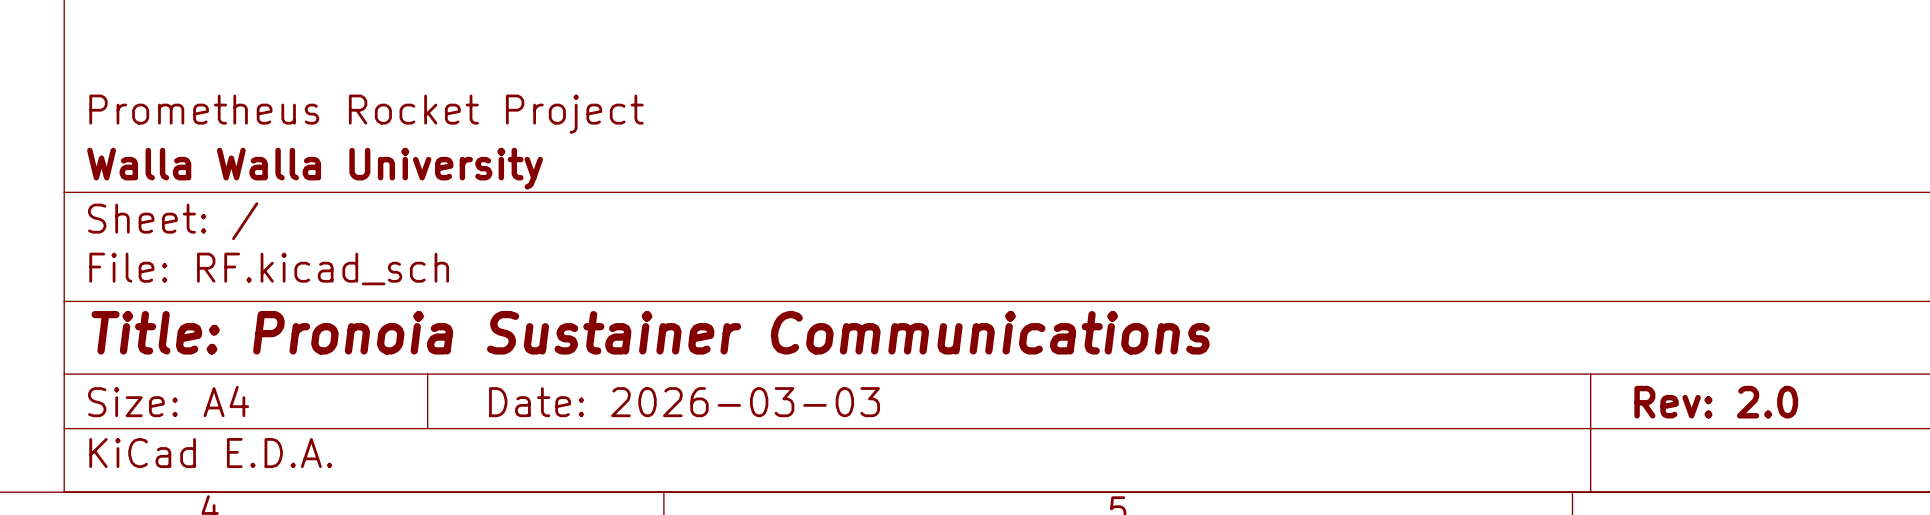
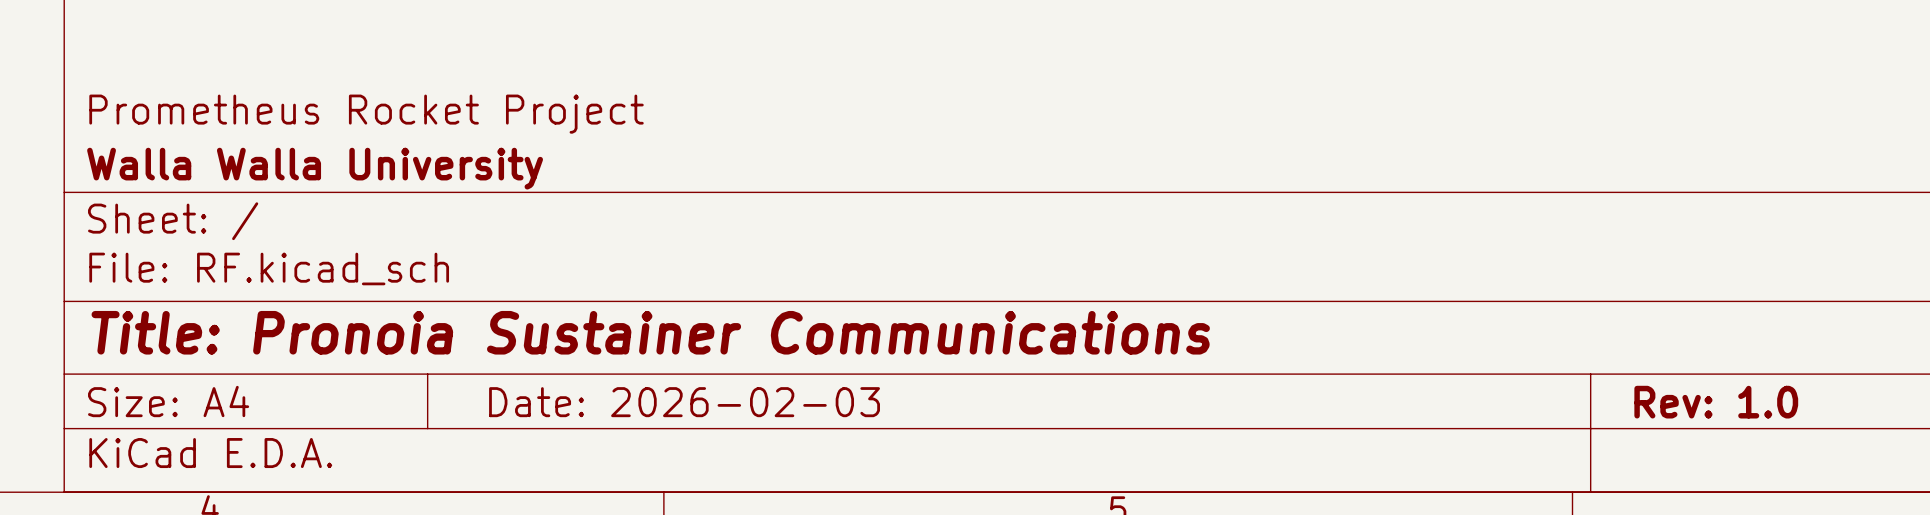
title block: Date: 2026-03-03 (684, 402) -> Date: 2026-02-03 (684, 402)
title block: Rev: 2.0 (1716, 402) -> Rev: 1.0 (1716, 402)

